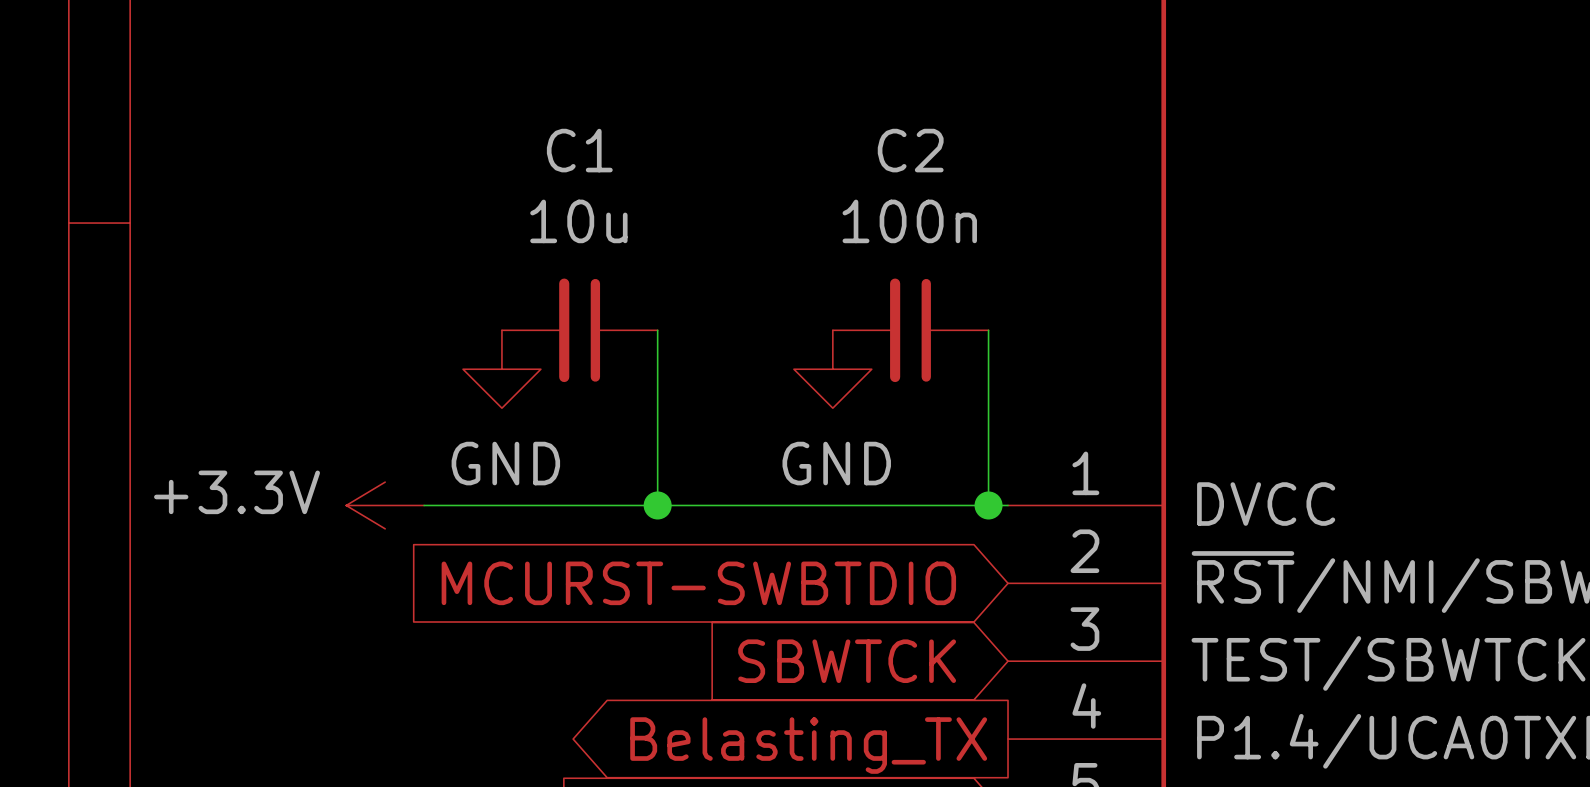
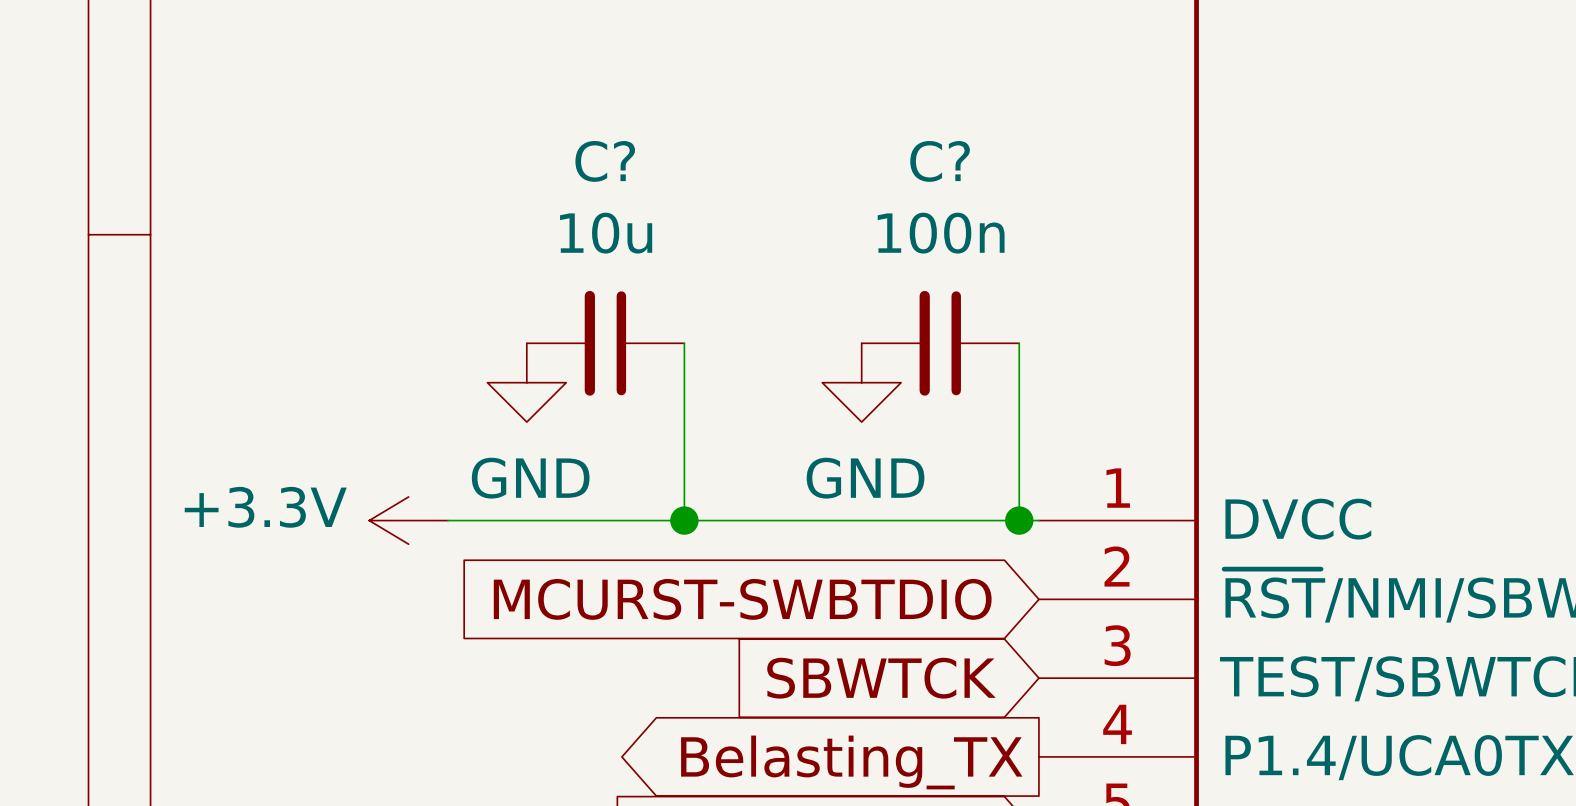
C1 name: C1 (579, 150) -> C? (605, 161)
C2 name: C2 (910, 150) -> C? (940, 161)

